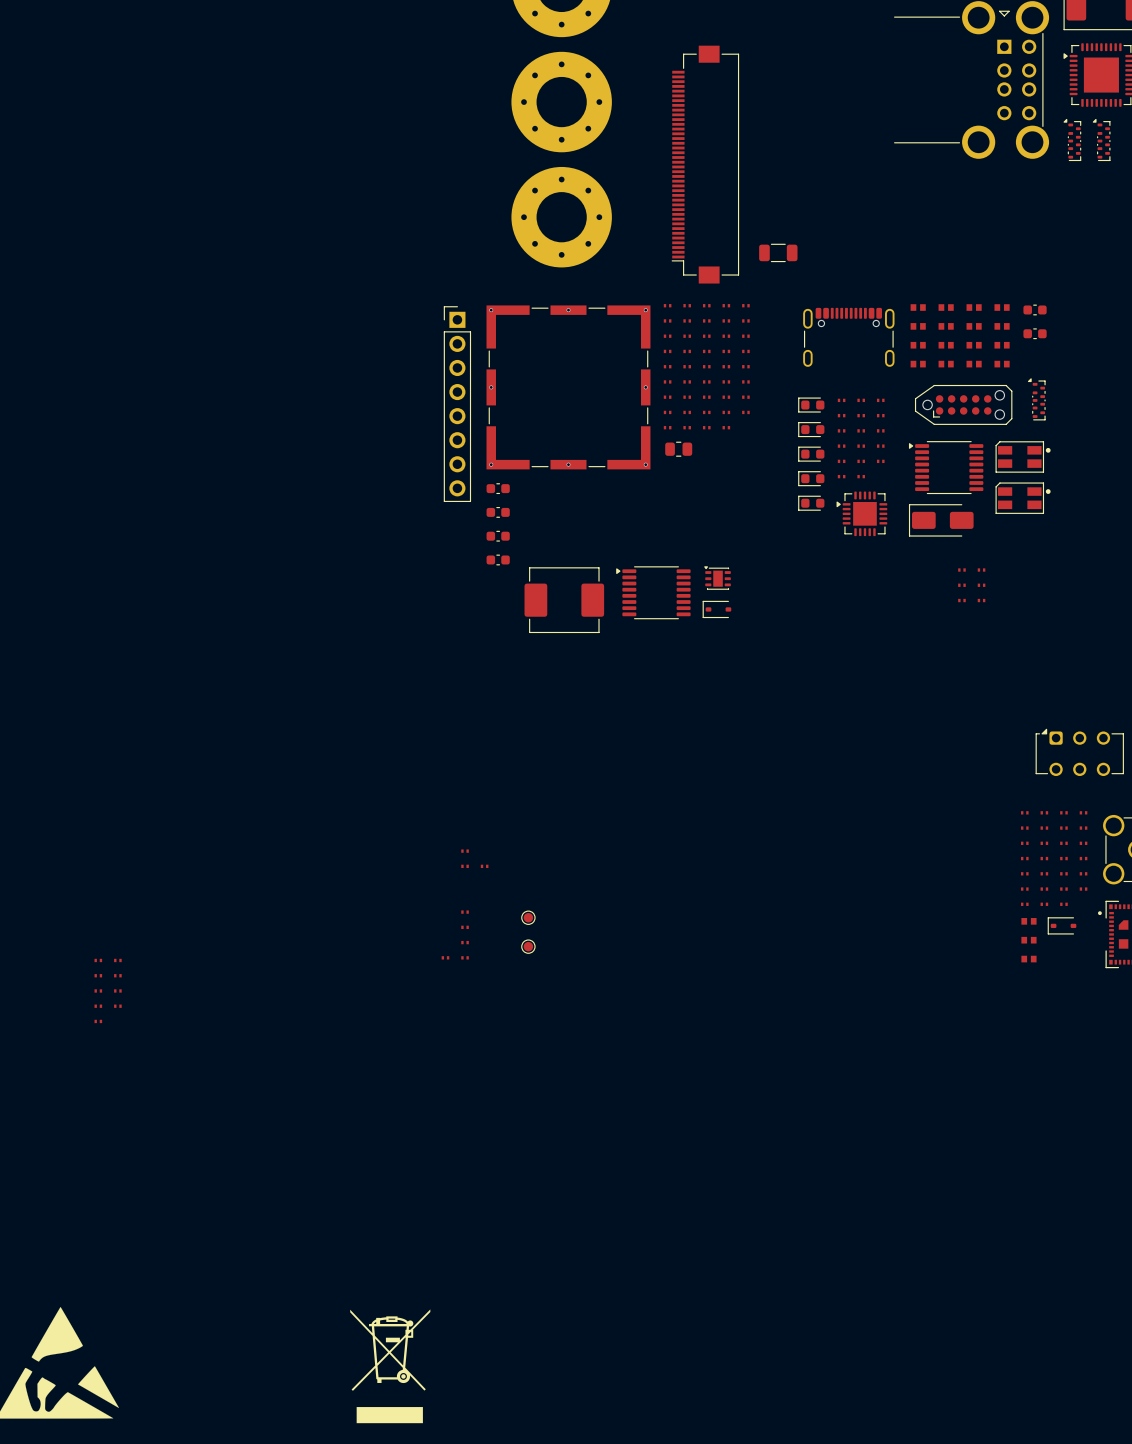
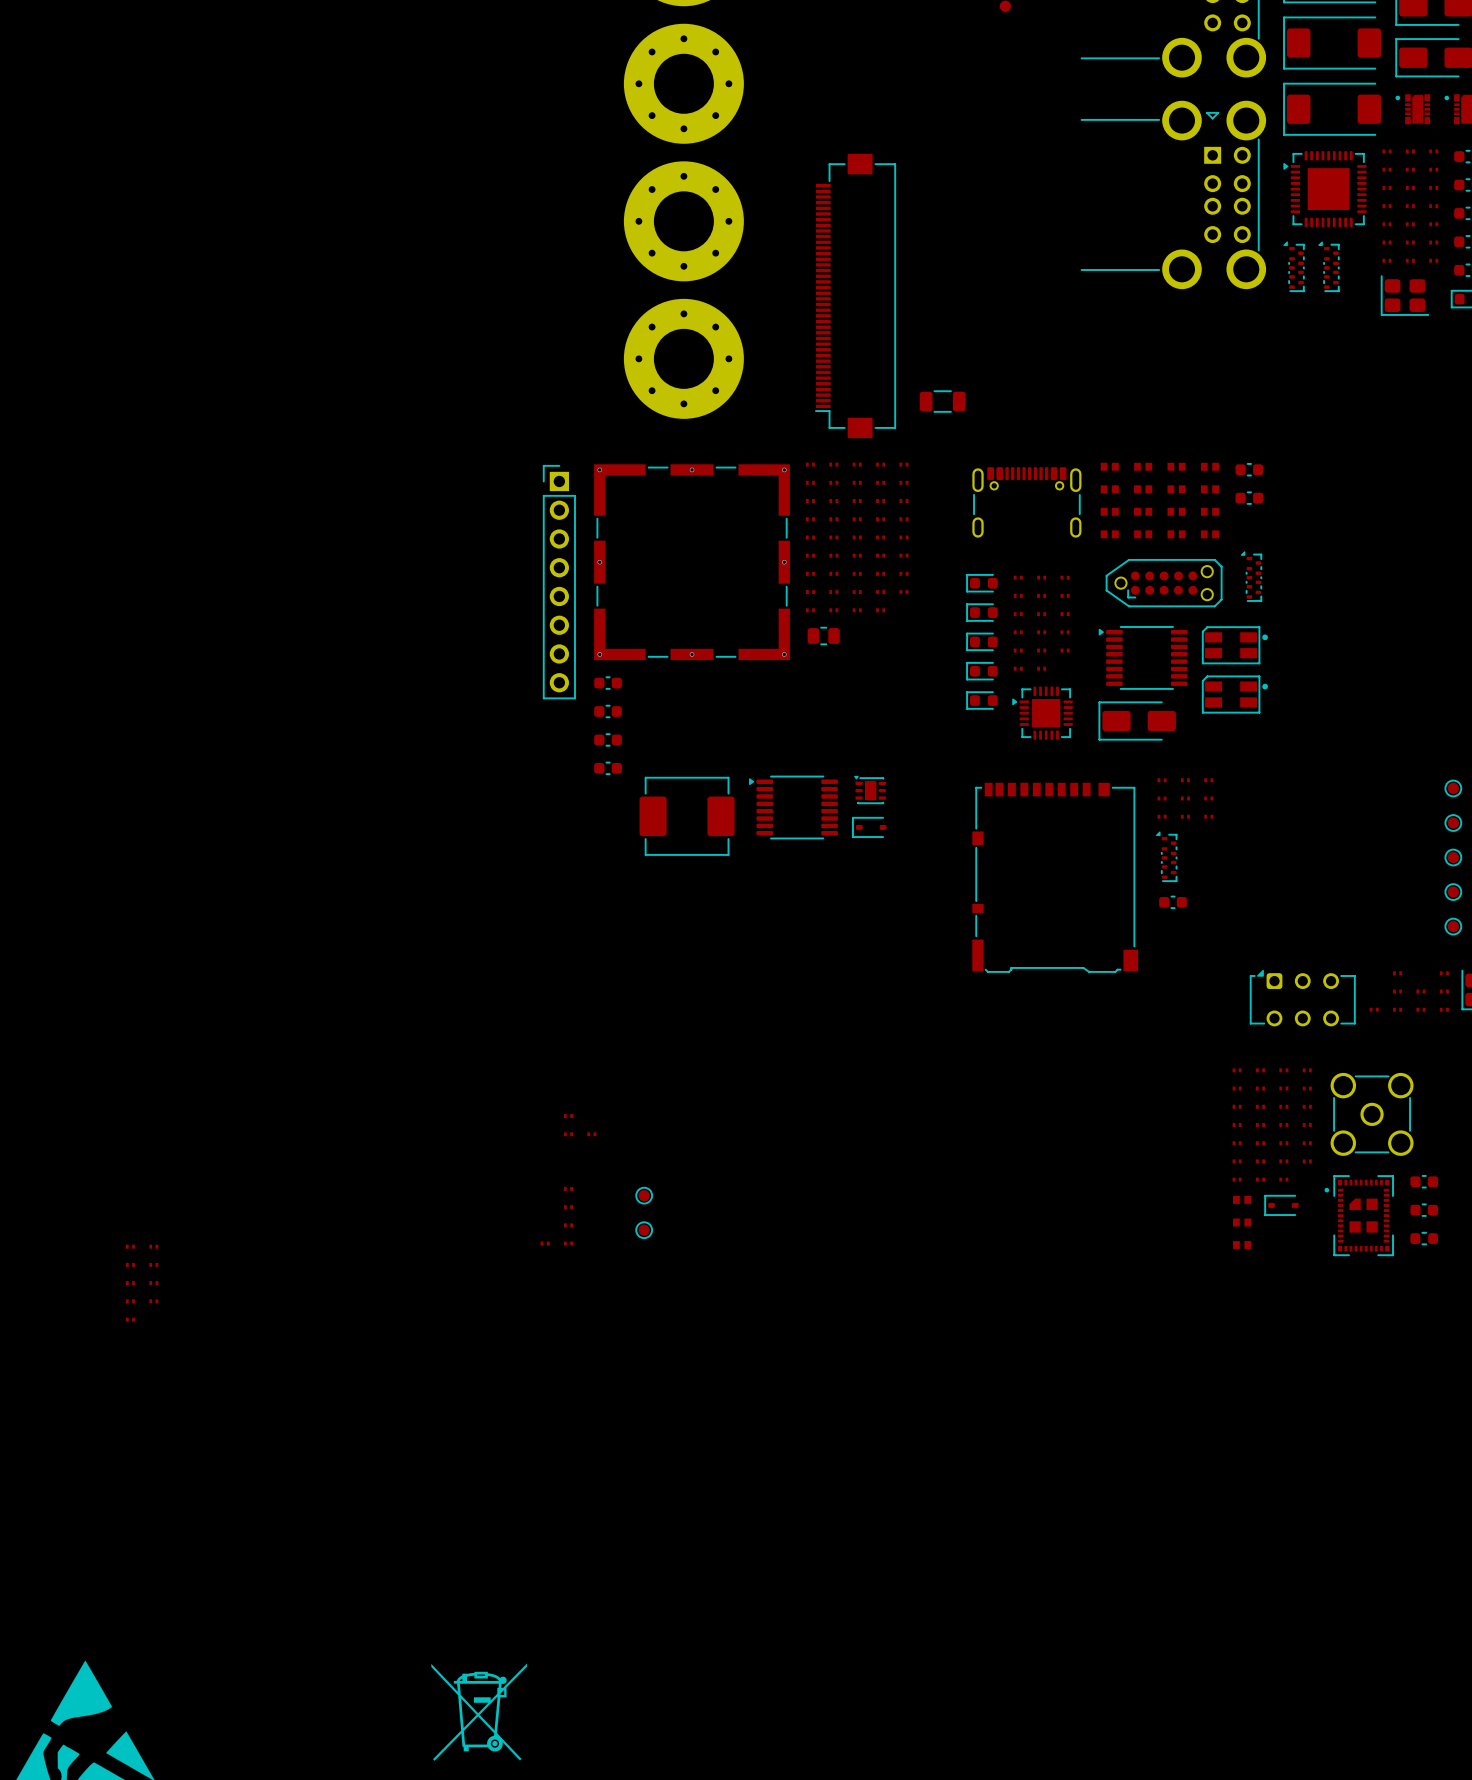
part: none -> (1208, 780)
part: none -> (1208, 798)
part: none -> (1208, 816)
part: none -> (1166, 856)
part: none -> (1055, 877)
part: none -> (1173, 902)

